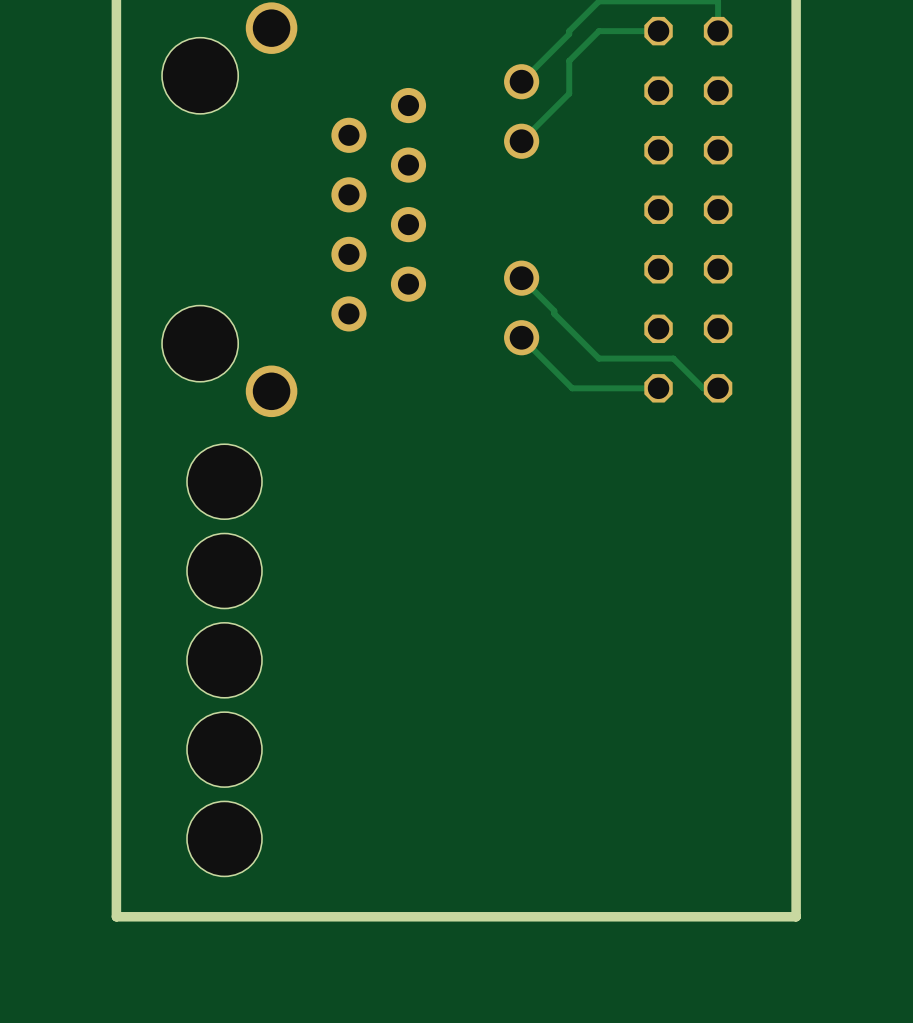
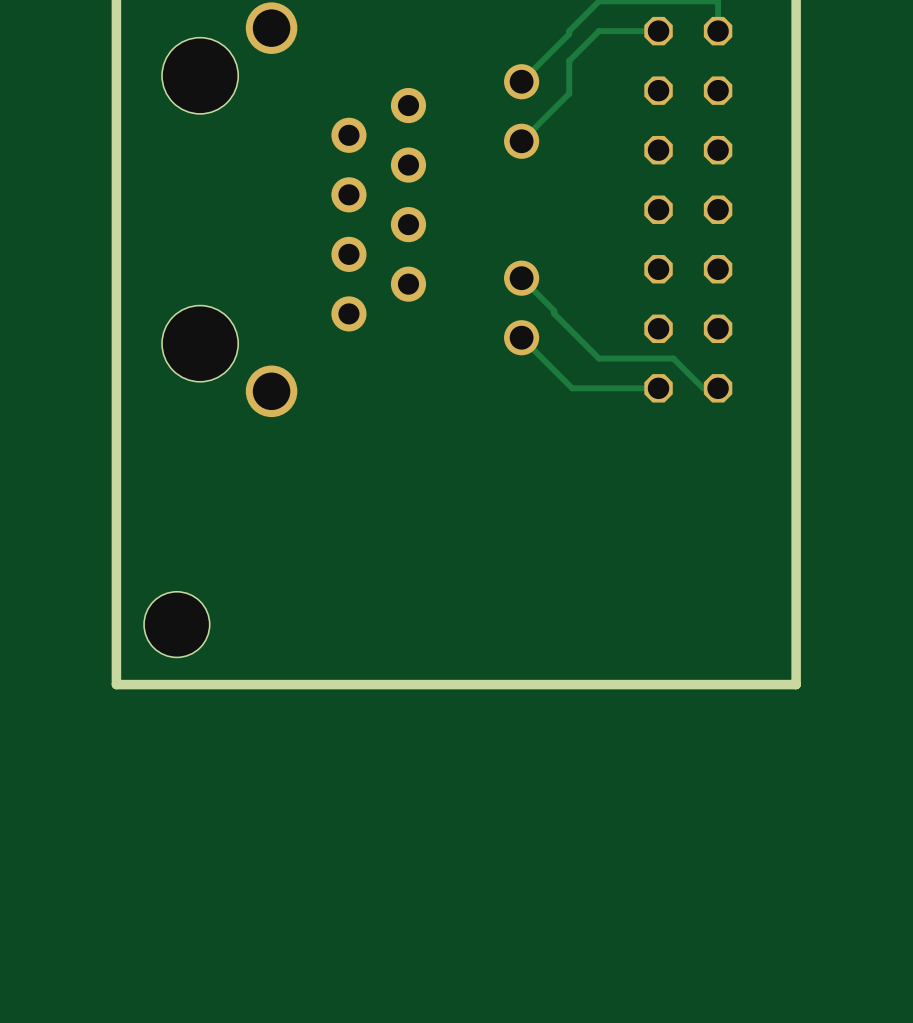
hole: (224, 481) -> none
hole: (224, 571) -> none
hole: none -> (176, 624)
hole: (224, 660) -> none
board edge: (796, 684) (796, 916) (116, 916) (116, 684) -> (796, 684) (116, 684)
hole: (224, 749) -> none
hole: (224, 838) -> none

